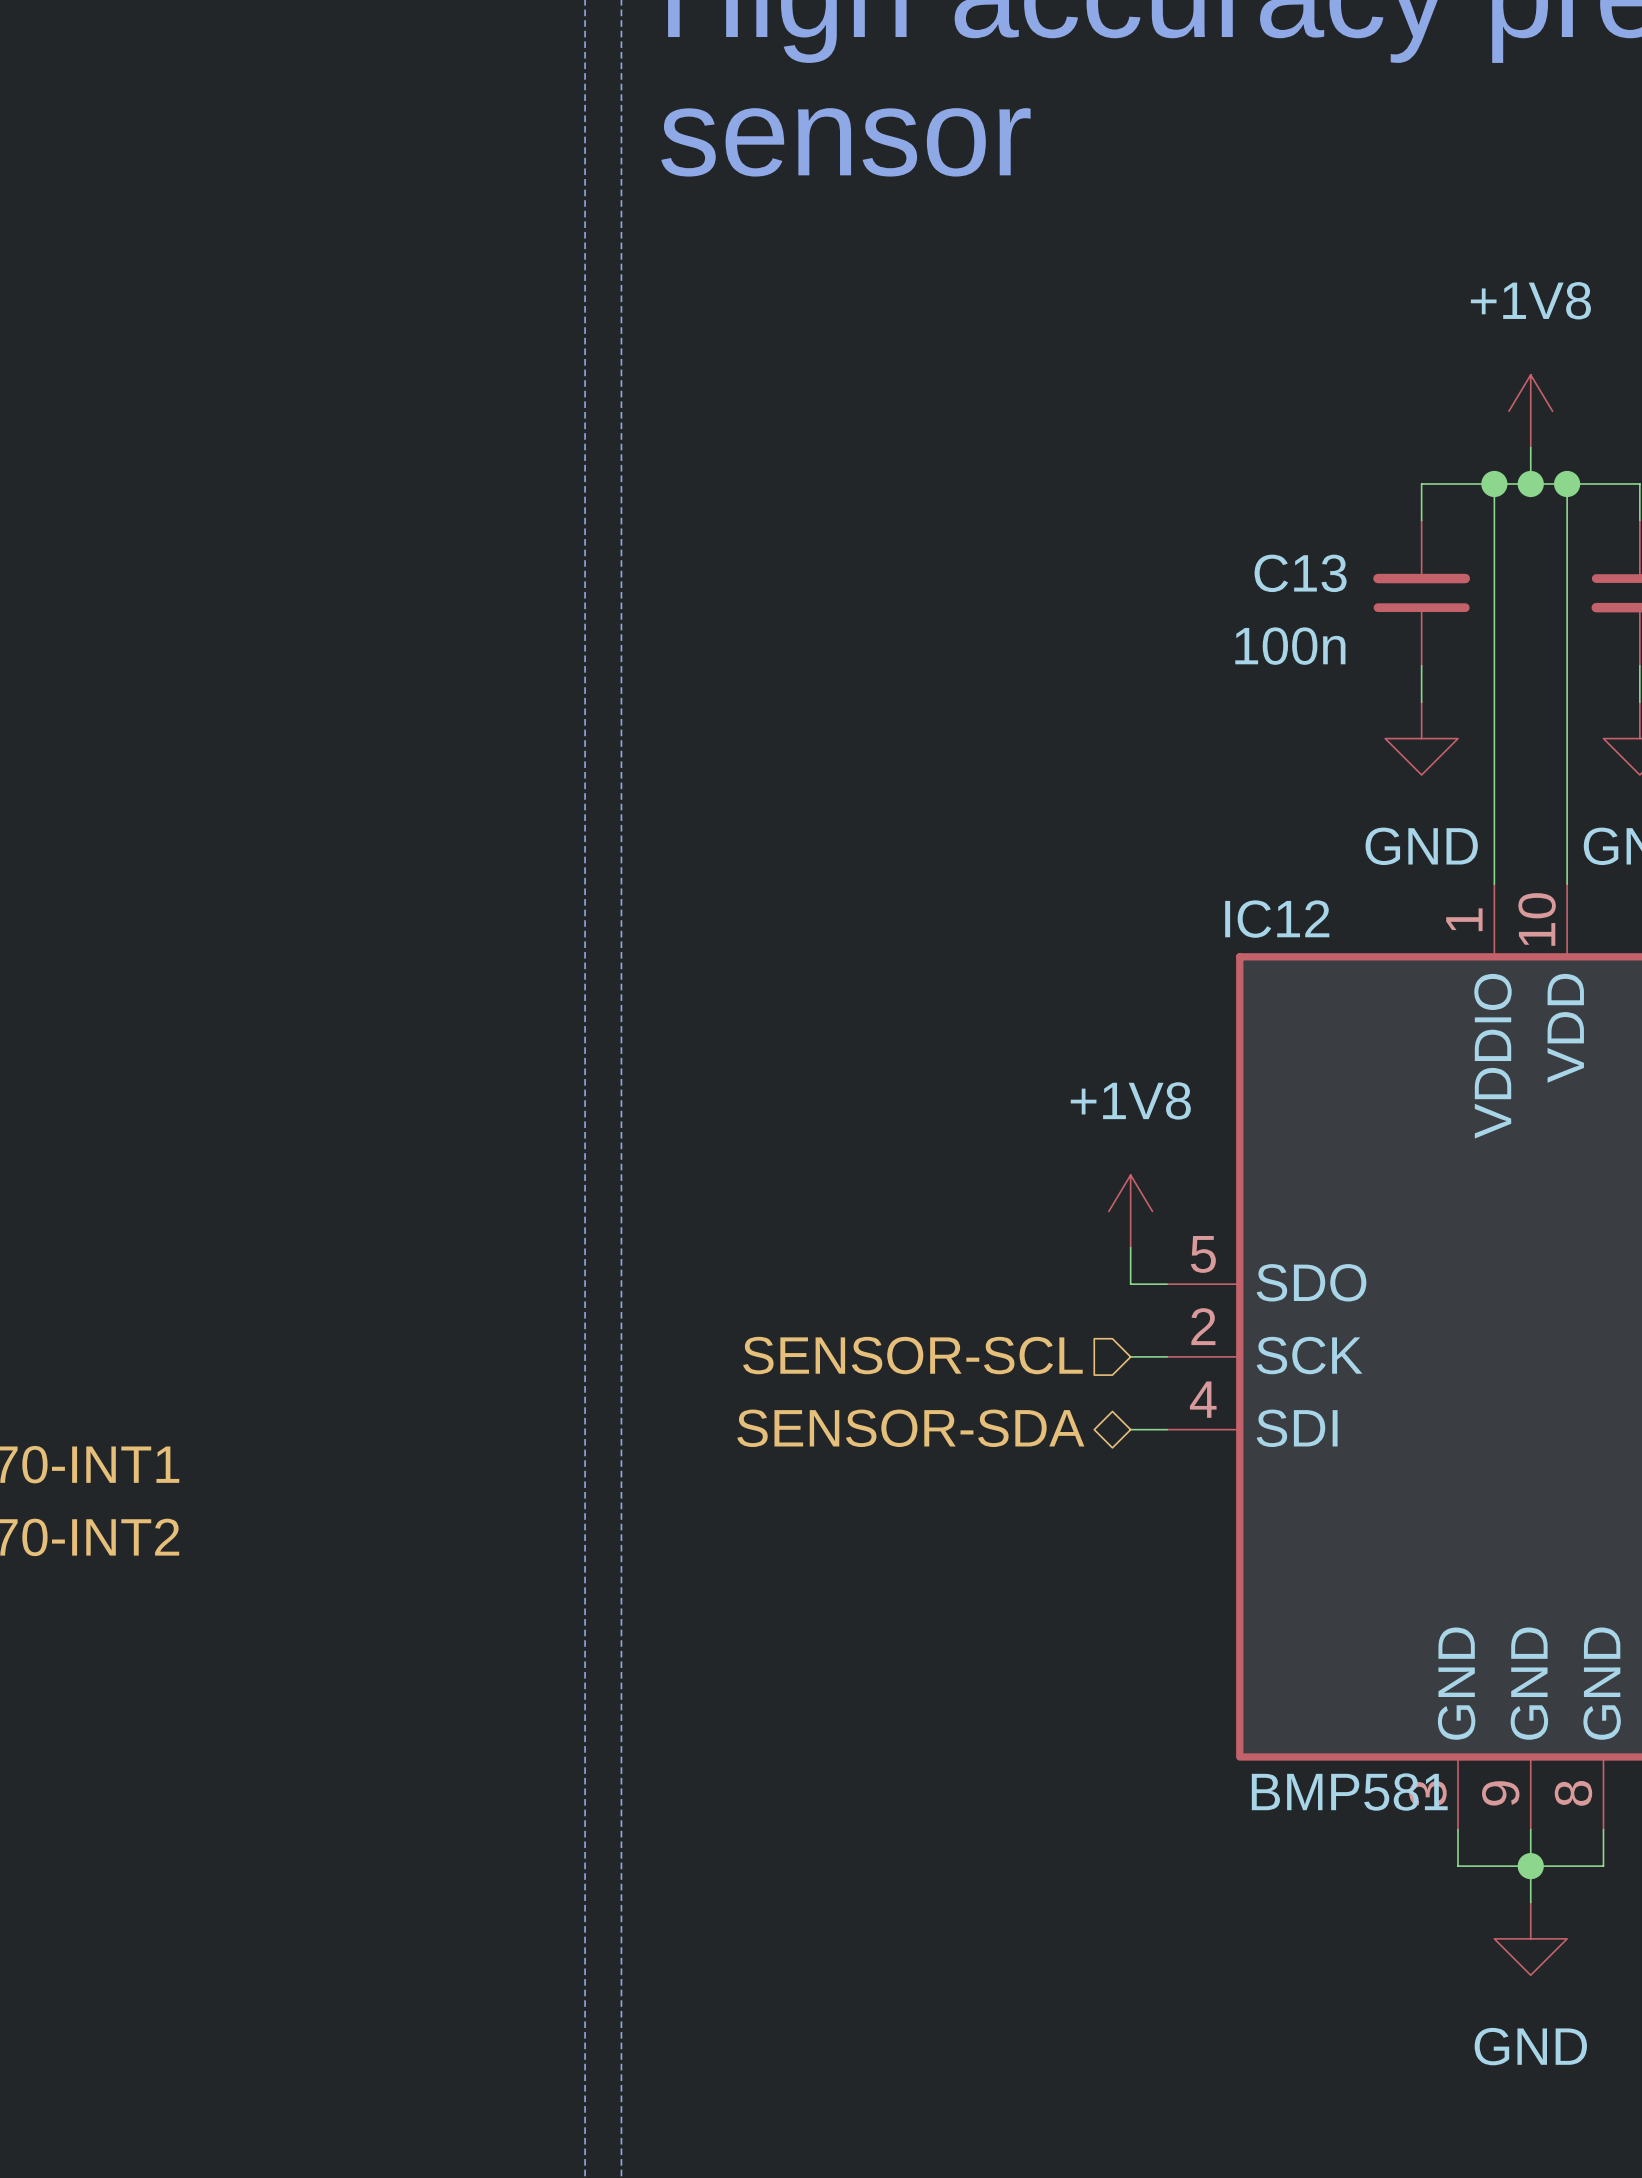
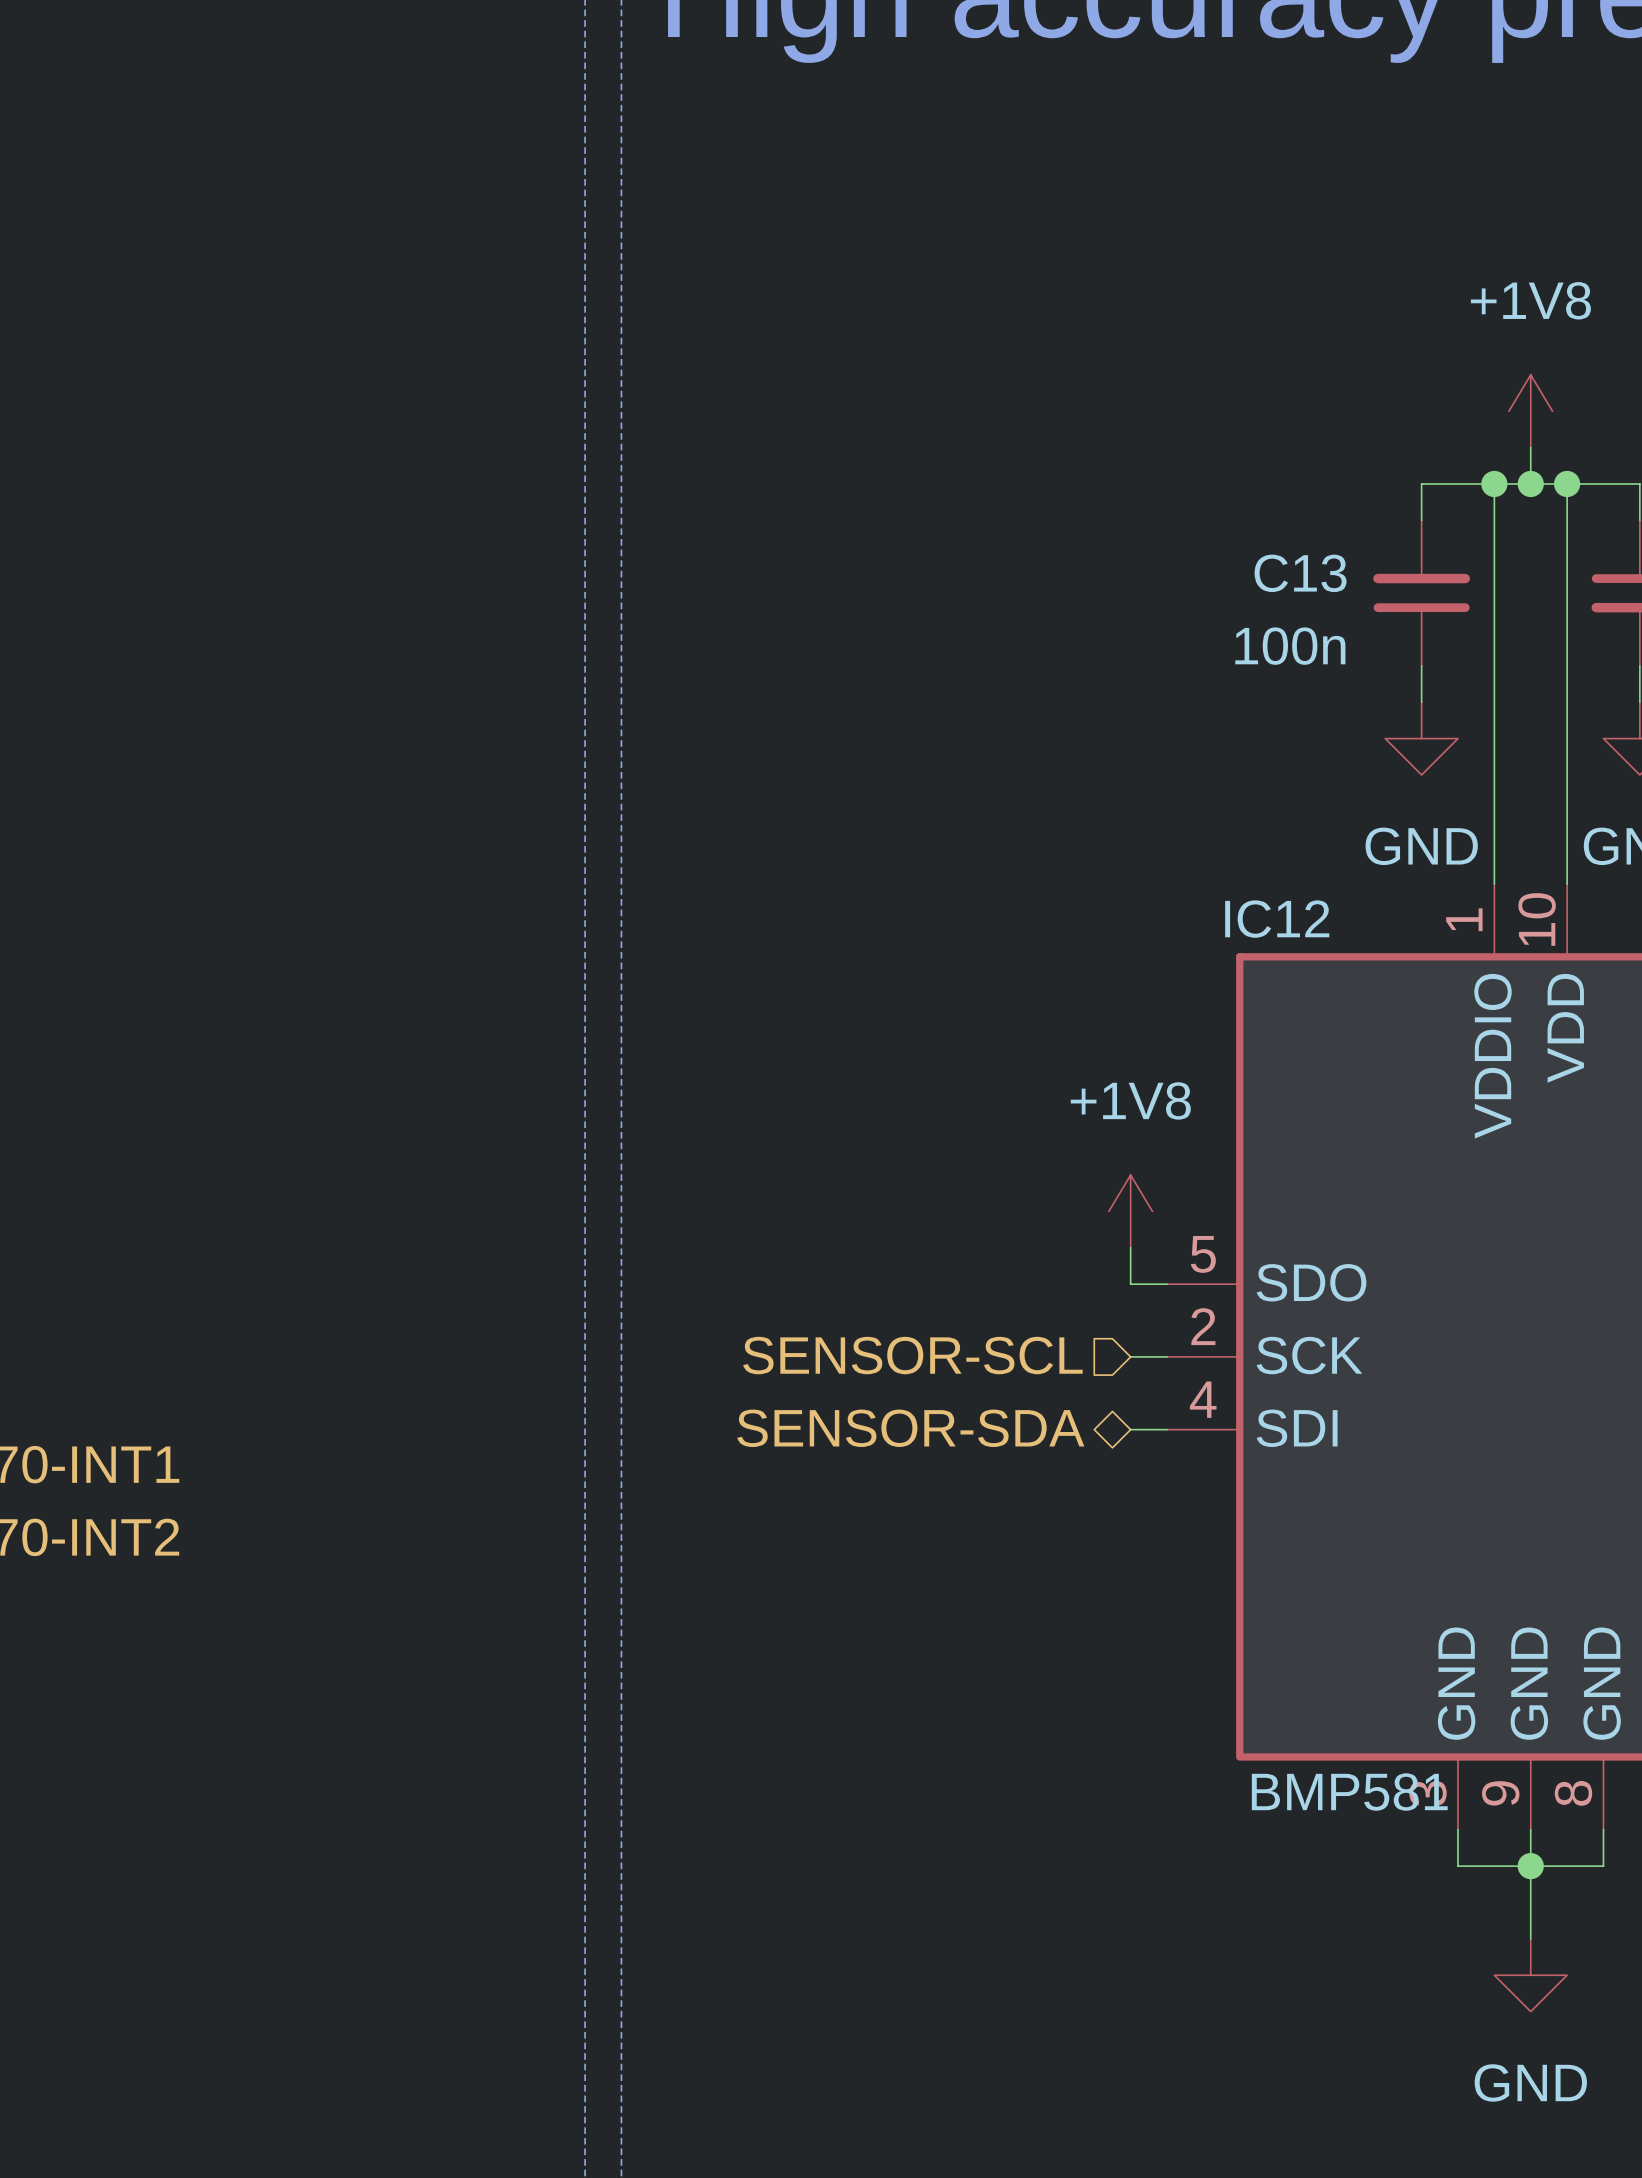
text: sensor (845, 142) -> none
power symbol position: GND (1530, 1938) -> GND (1530, 1975)

